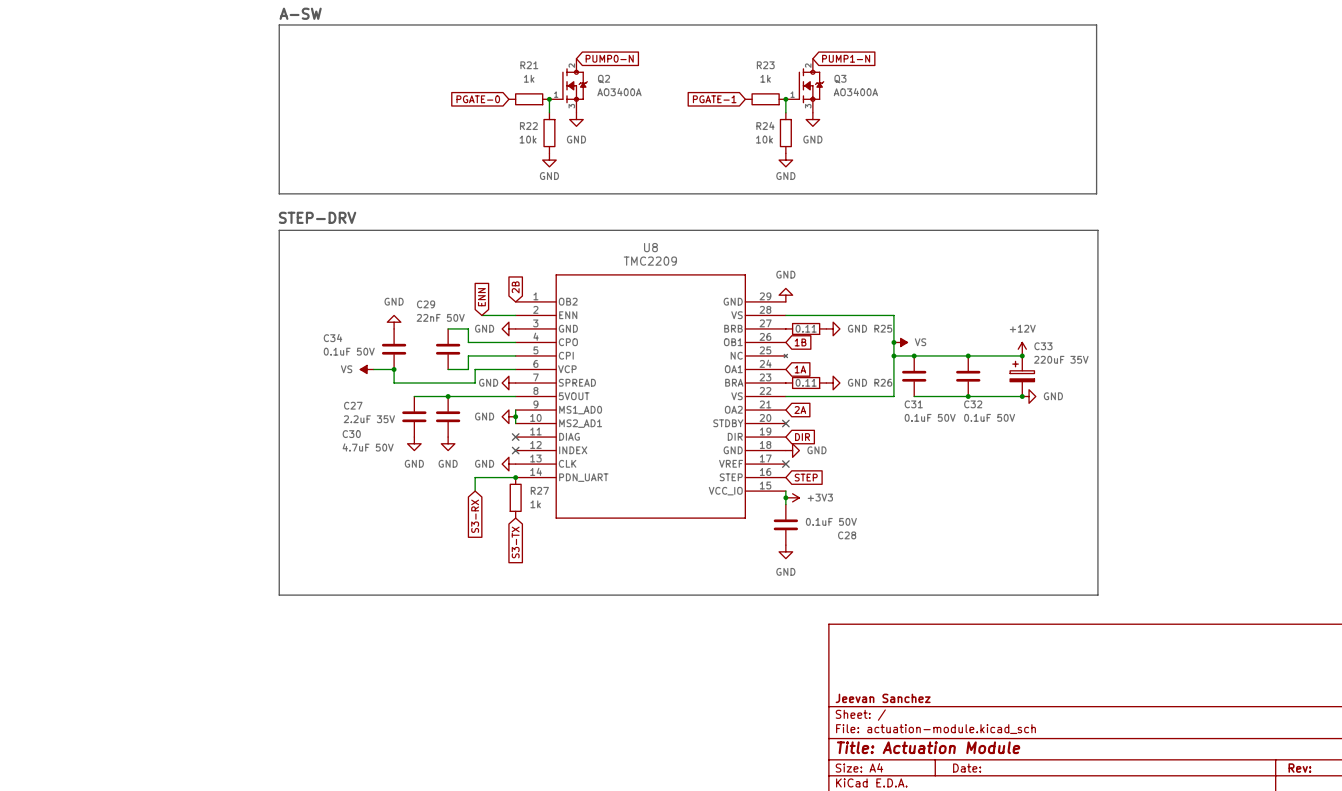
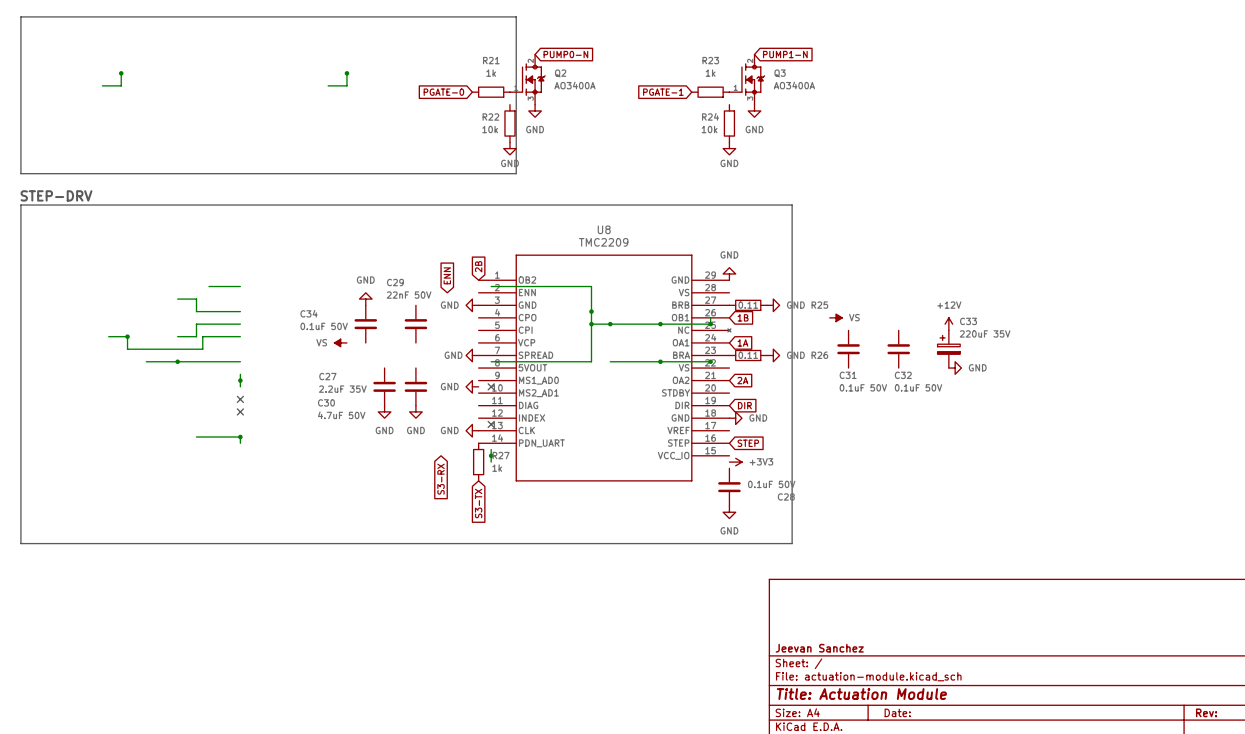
text: A-SW (300, 13) -> none
line: none -> (20, 16) (516, 16) (516, 173) (20, 173) (20, 16)
line: (279, 24) (1096, 24) (1096, 193) (279, 193) (279, 24) -> none
wire: none -> (121, 73) (121, 85) (102, 85)
junction: none -> (121, 73)
wire: none -> (346, 73) (346, 85) (328, 85)
junction: none -> (346, 73)
wire: (549, 99) (549, 112) -> none
junction: (549, 99) -> none
wire: (785, 99) (785, 112) -> none
junction: (785, 99) -> none
text: none -> STEP-DRV (56, 195)
text: STEP-DRV (317, 217) -> none
line: (279, 230) (279, 595) (1097, 595) (1097, 230) (279, 230) -> (20, 205) (20, 543) (792, 543) (792, 205) (20, 205)
wire: none -> (209, 286) (240, 286)
wire: none -> (491, 286) (591, 286) (591, 361) (491, 361)
wire: (481, 315) (515, 315) -> none
wire: (785, 315) (893, 315) (893, 396) (785, 396) -> none
wire: none -> (177, 299) (196, 299) (196, 311) (240, 311)
wire: (448, 328) (468, 328) (468, 342) (515, 342) -> none
junction: none -> (591, 311)
wire: none -> (710, 317) (710, 324) (591, 324)
junction: (893, 342) -> none
wire: none -> (240, 324) (196, 324) (196, 336) (177, 336)
junction: none -> (591, 324)
junction: none -> (610, 324)
junction: none -> (660, 324)
junction: none -> (710, 324)
wire: (515, 355) (468, 355) (468, 369) (448, 369) -> none
wire: (893, 355) (1022, 355) -> none
junction: (893, 355) -> none
junction: (914, 355) -> none
junction: (968, 355) -> none
junction: (1022, 355) -> none
wire: none -> (108, 336) (127, 336) (127, 349) (202, 349) (202, 336) (240, 336)
junction: none -> (127, 336)
wire: (373, 369) (394, 369) (394, 383) (475, 383) (475, 369) (515, 369) -> none
junction: (394, 369) -> none
wire: none -> (146, 361) (240, 361)
junction: none -> (177, 361)
wire: none -> (610, 361) (710, 361)
junction: none -> (660, 361)
junction: none -> (710, 361)
wire: (414, 396) (515, 396) -> none
junction: (448, 396) -> none
wire: (914, 396) (1022, 396) -> none
junction: (968, 396) -> none
junction: (1022, 396) -> none
wire: none -> (240, 374) (240, 386)
junction: none -> (240, 380)
wire: (515, 410) (515, 423) -> (491, 449) (491, 462)
junction: (515, 416) -> none
no-connect mark: none -> (491, 386)
no-connect mark: (785, 423) -> none
no-connect mark: none -> (240, 399)
no-connect mark: (515, 437) -> none
no-connect mark: none -> (240, 411)
no-connect mark: (515, 450) -> none
no-connect mark: none -> (491, 424)
no-connect mark: (785, 464) -> none
wire: none -> (196, 437) (240, 437) (240, 443)
junction: none -> (240, 437)
wire: (515, 477) (475, 477) (475, 491) -> none
junction position: (515, 477) -> (491, 455)
wire: (785, 491) (785, 504) -> none
junction: (785, 497) -> none

